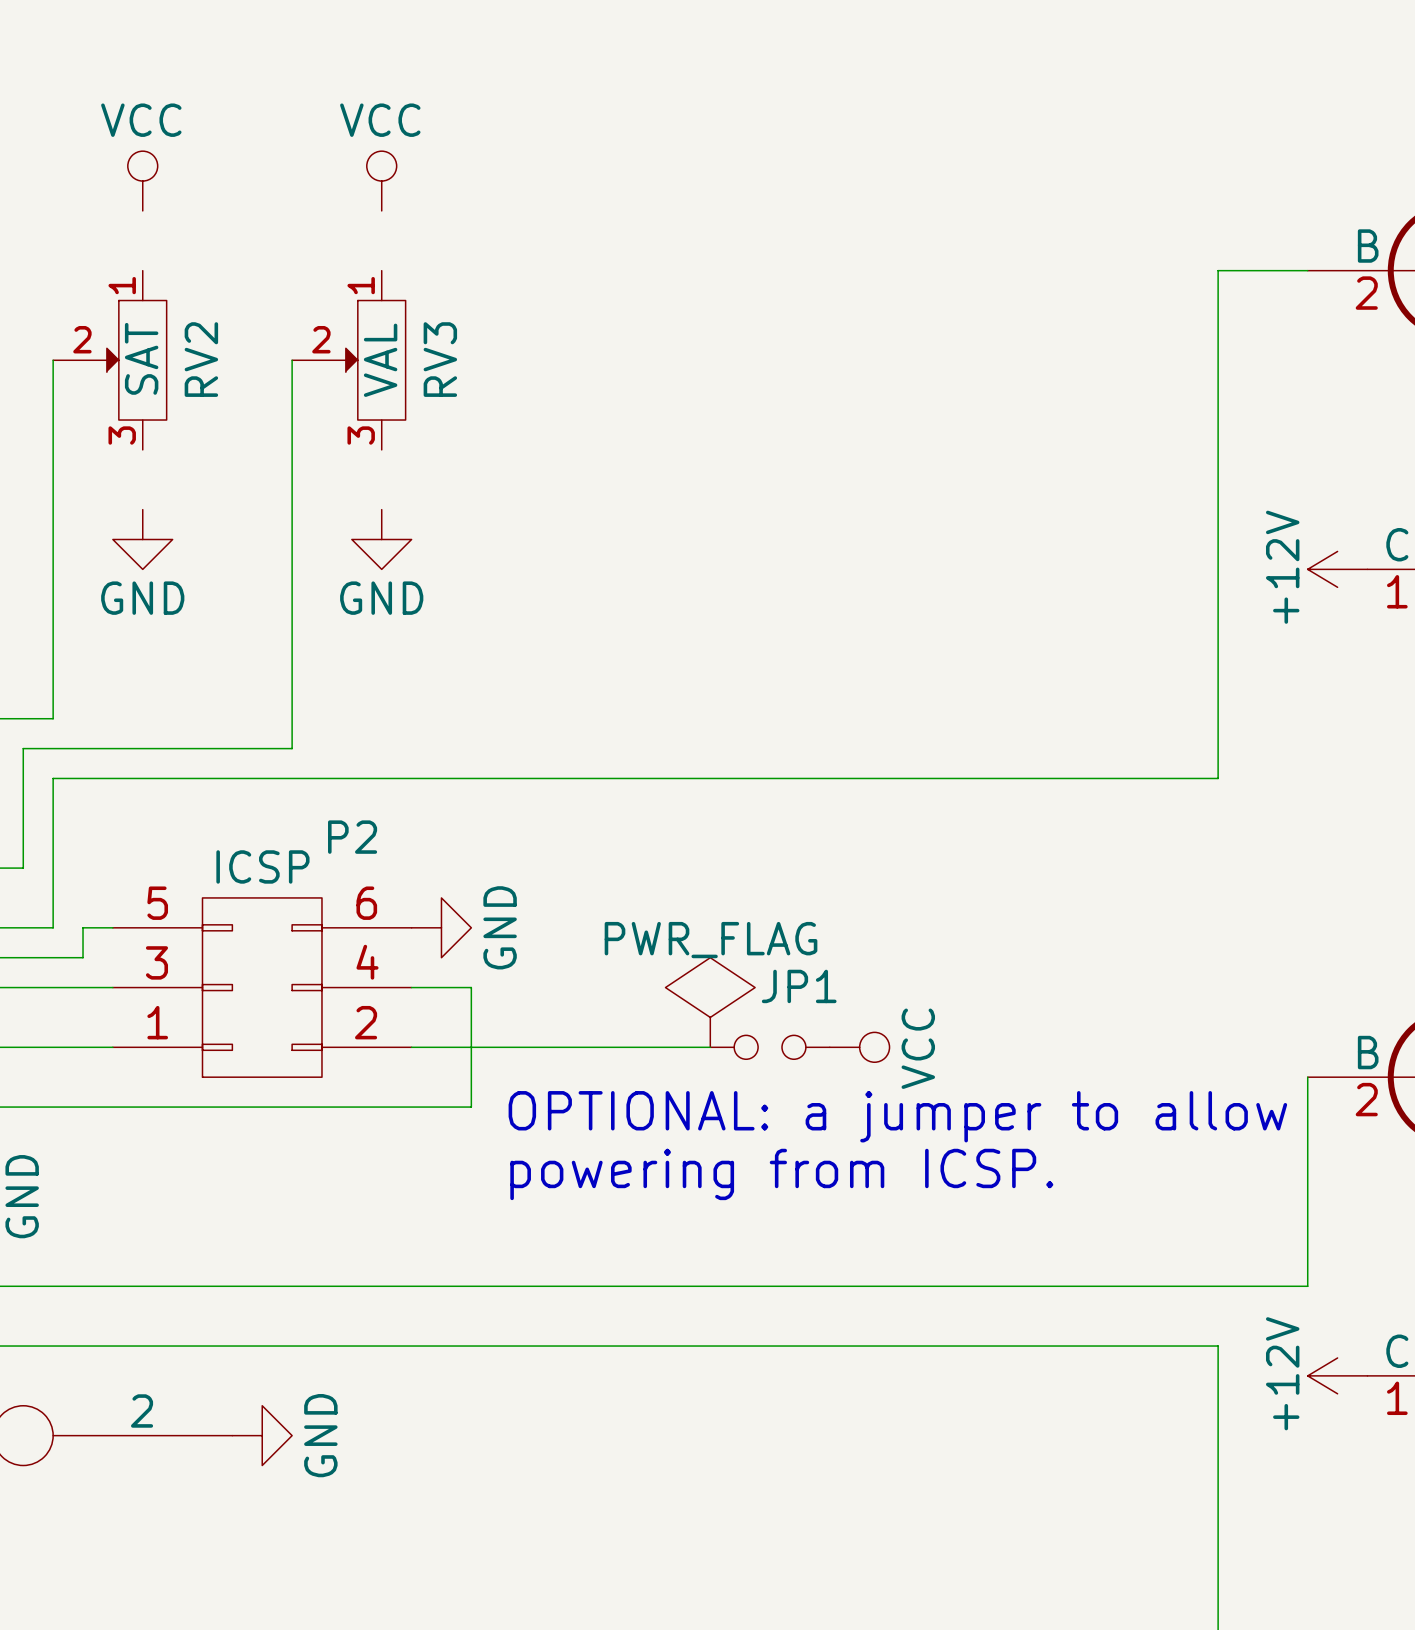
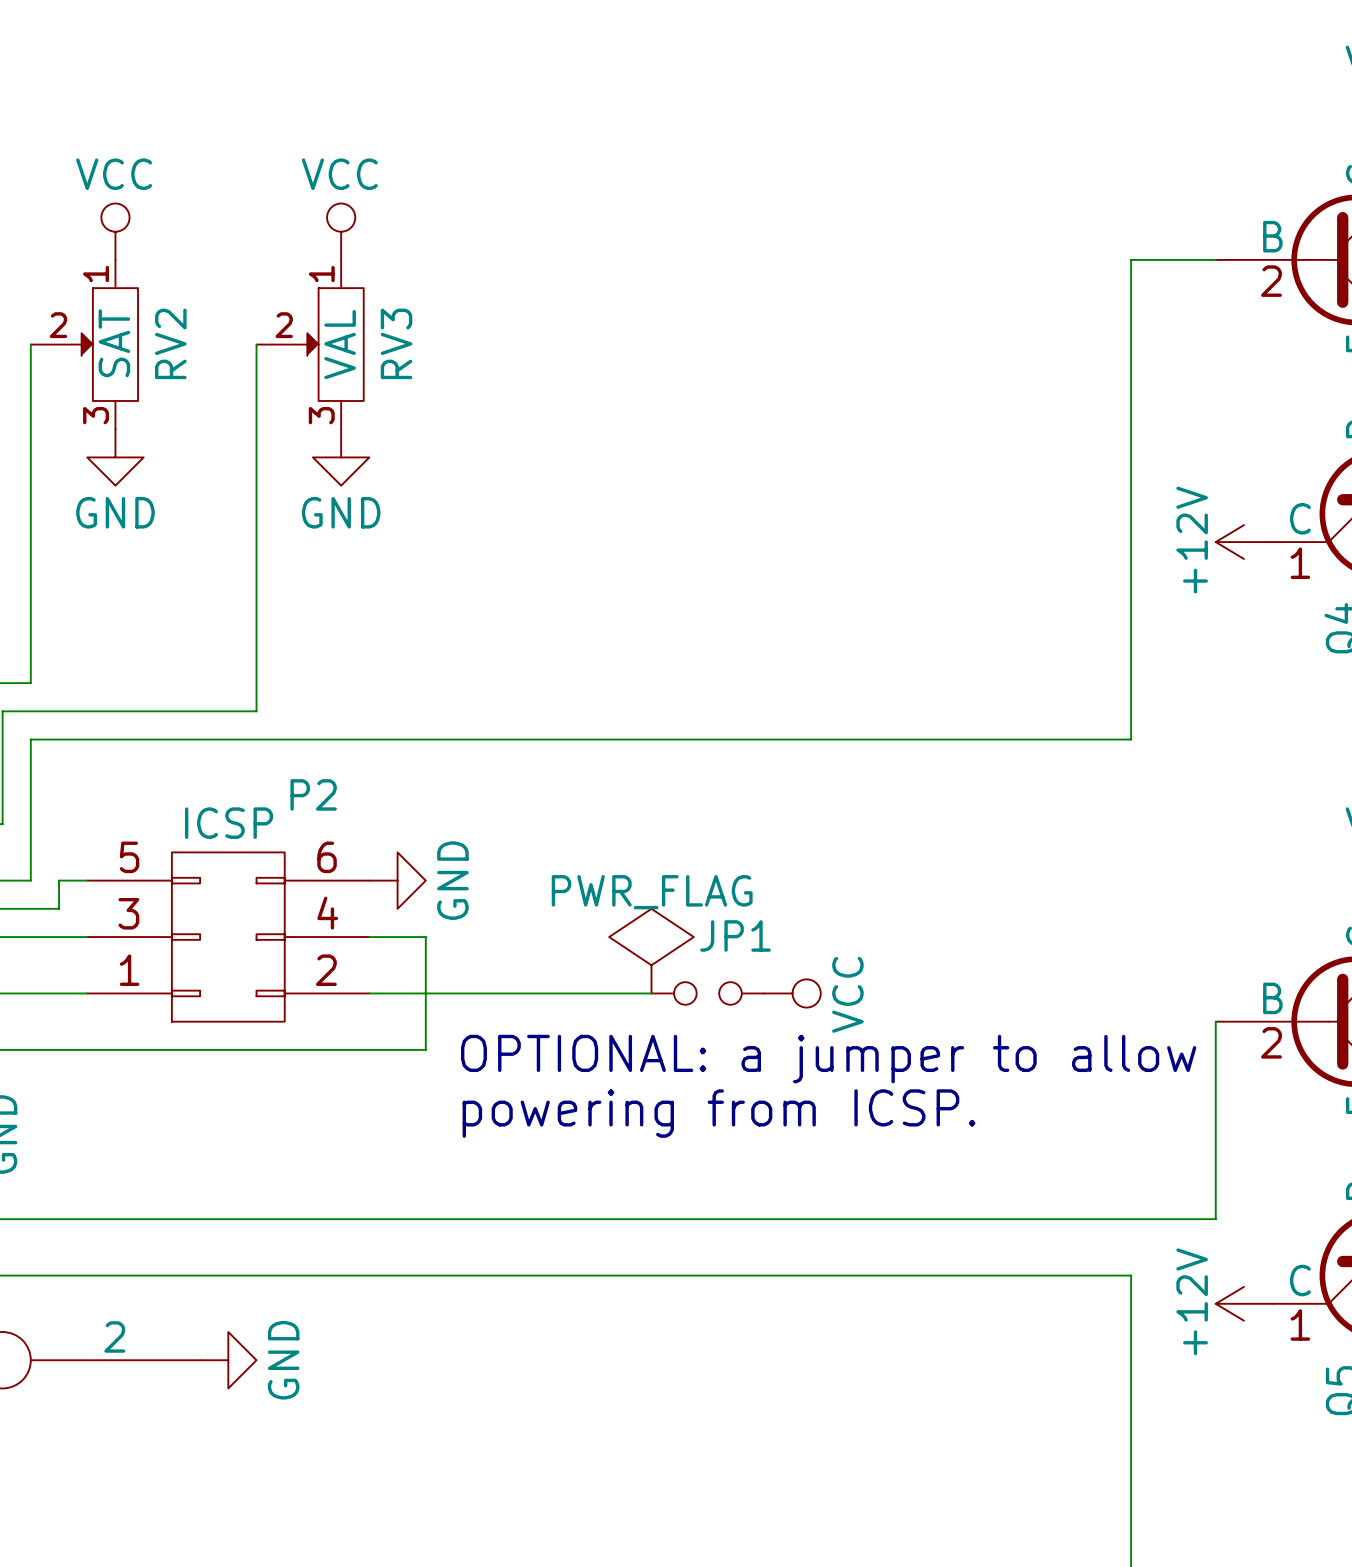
power symbol position: VCC (142, 181) -> VCC (115, 231)
power symbol position: VCC (381, 181) -> VCC (341, 231)
power symbol position: GND (142, 539) -> GND (115, 457)
power symbol position: GND (381, 539) -> GND (341, 457)

